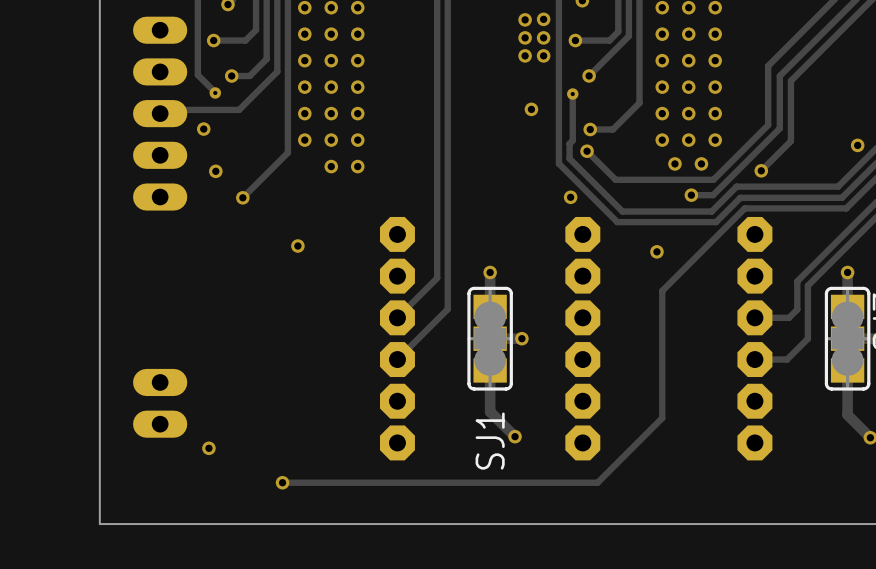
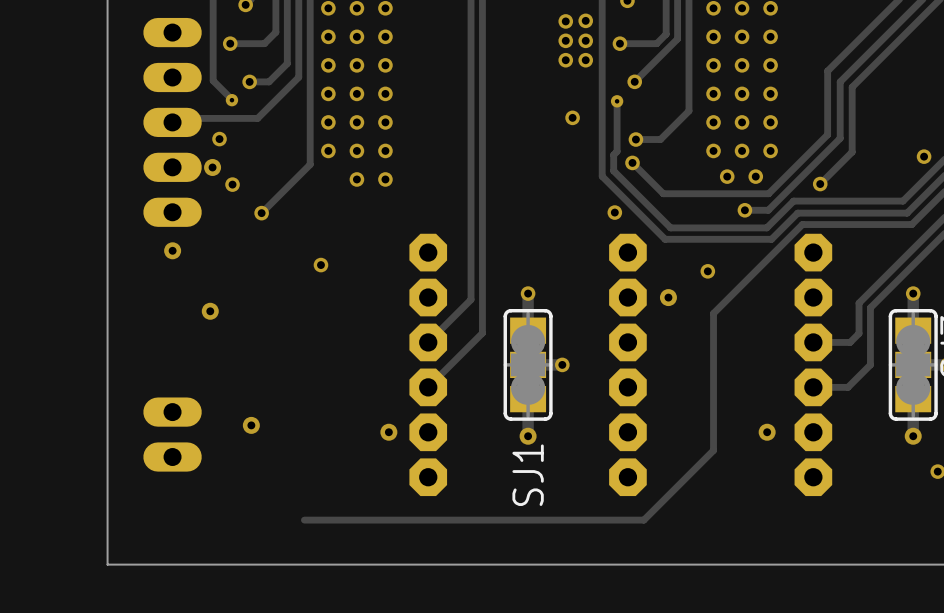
via: none -> (212, 167)
via: none -> (172, 250)
via: none -> (668, 297)
via: none -> (210, 311)
via: none -> (251, 425)
via: none -> (388, 432)
via: none -> (767, 432)
track: (490, 404) (490, 411) (515, 436) -> none
via: none -> (528, 436)
track: (847, 404) (847, 414) (870, 437) -> none
via: none -> (913, 436)
via: (515, 436) -> none
via: (208, 448) -> none
via: (282, 482) -> none

